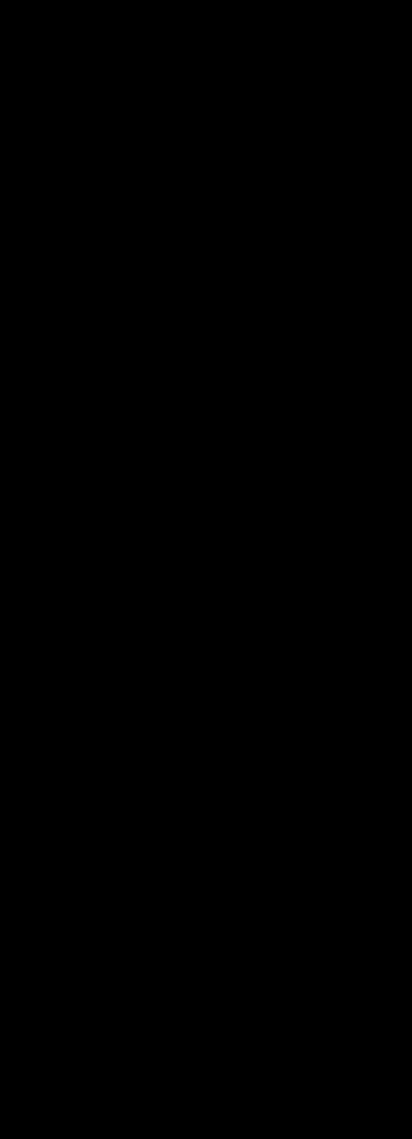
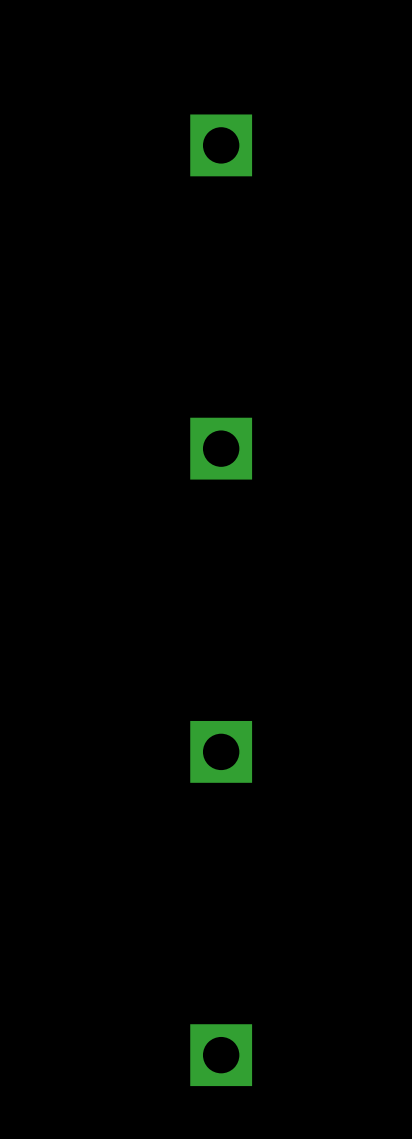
part: none -> (221, 145)
part: none -> (221, 448)
part: none -> (221, 751)
part: none -> (221, 1055)

